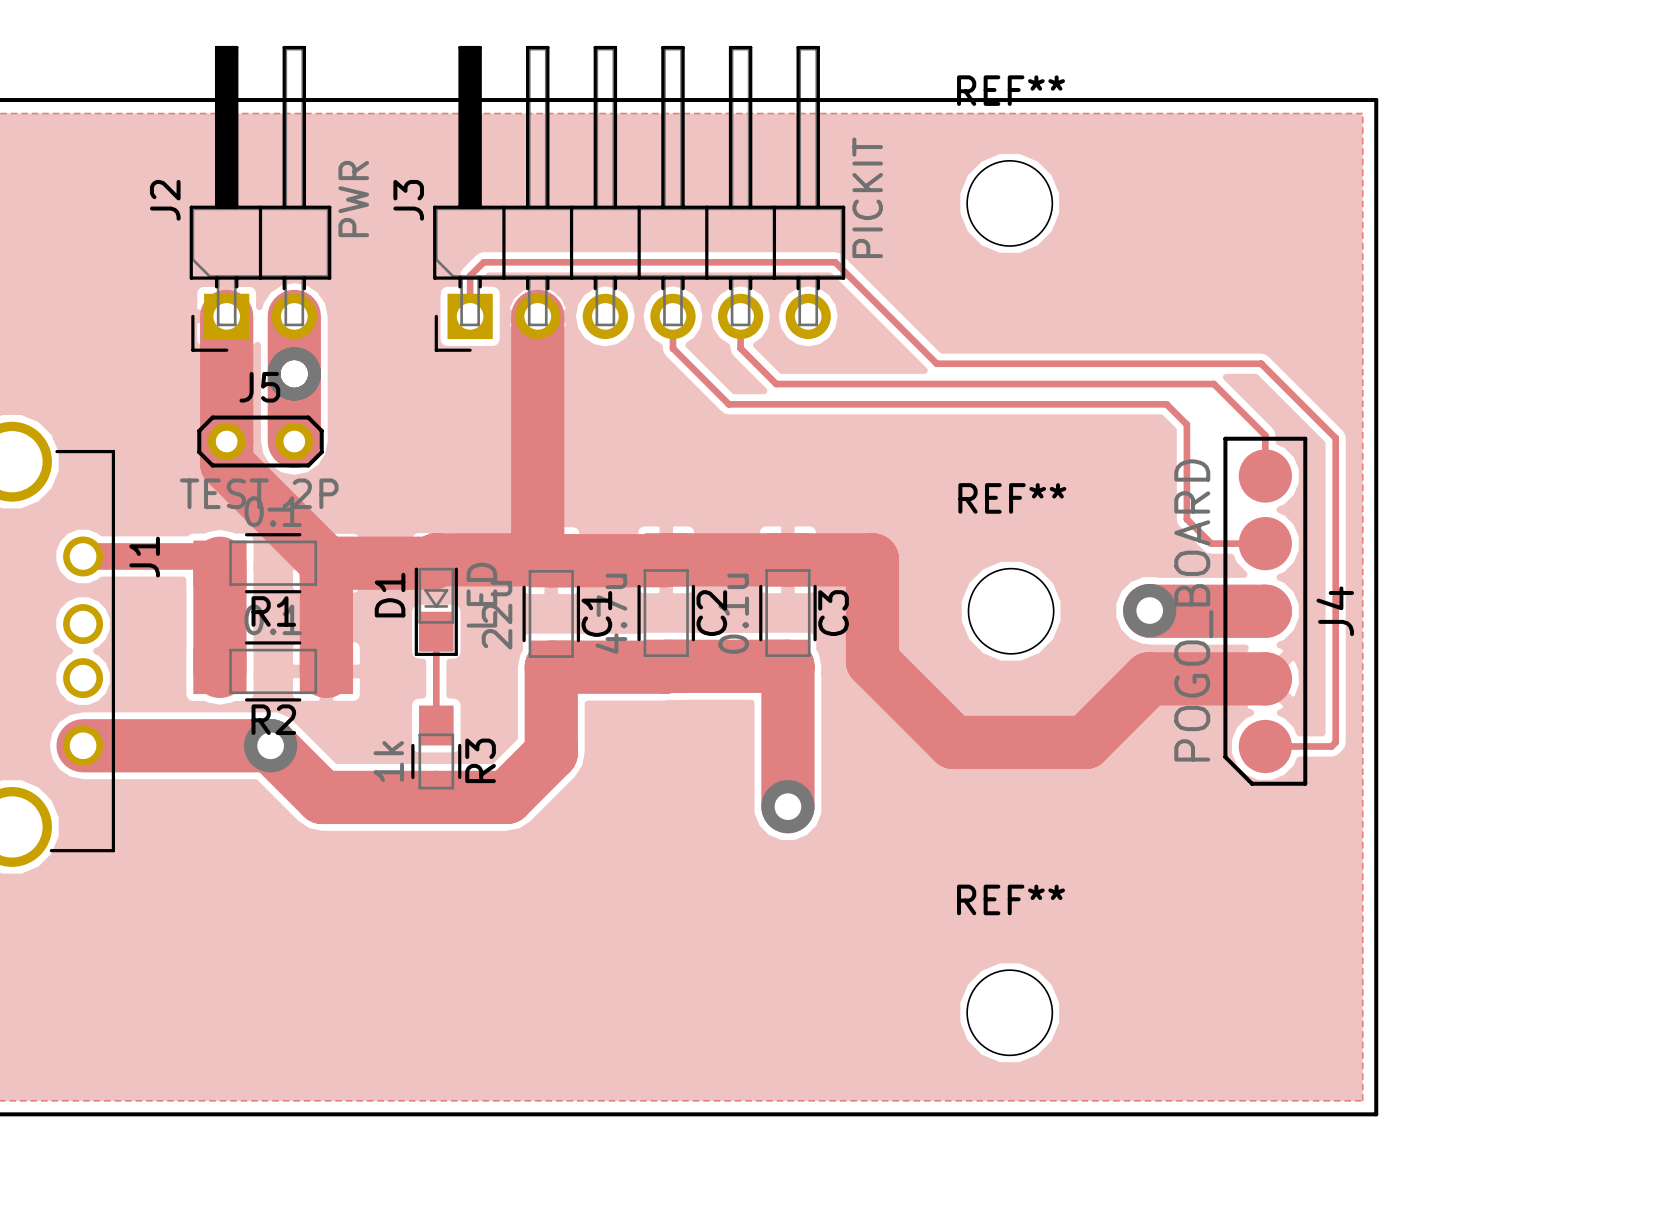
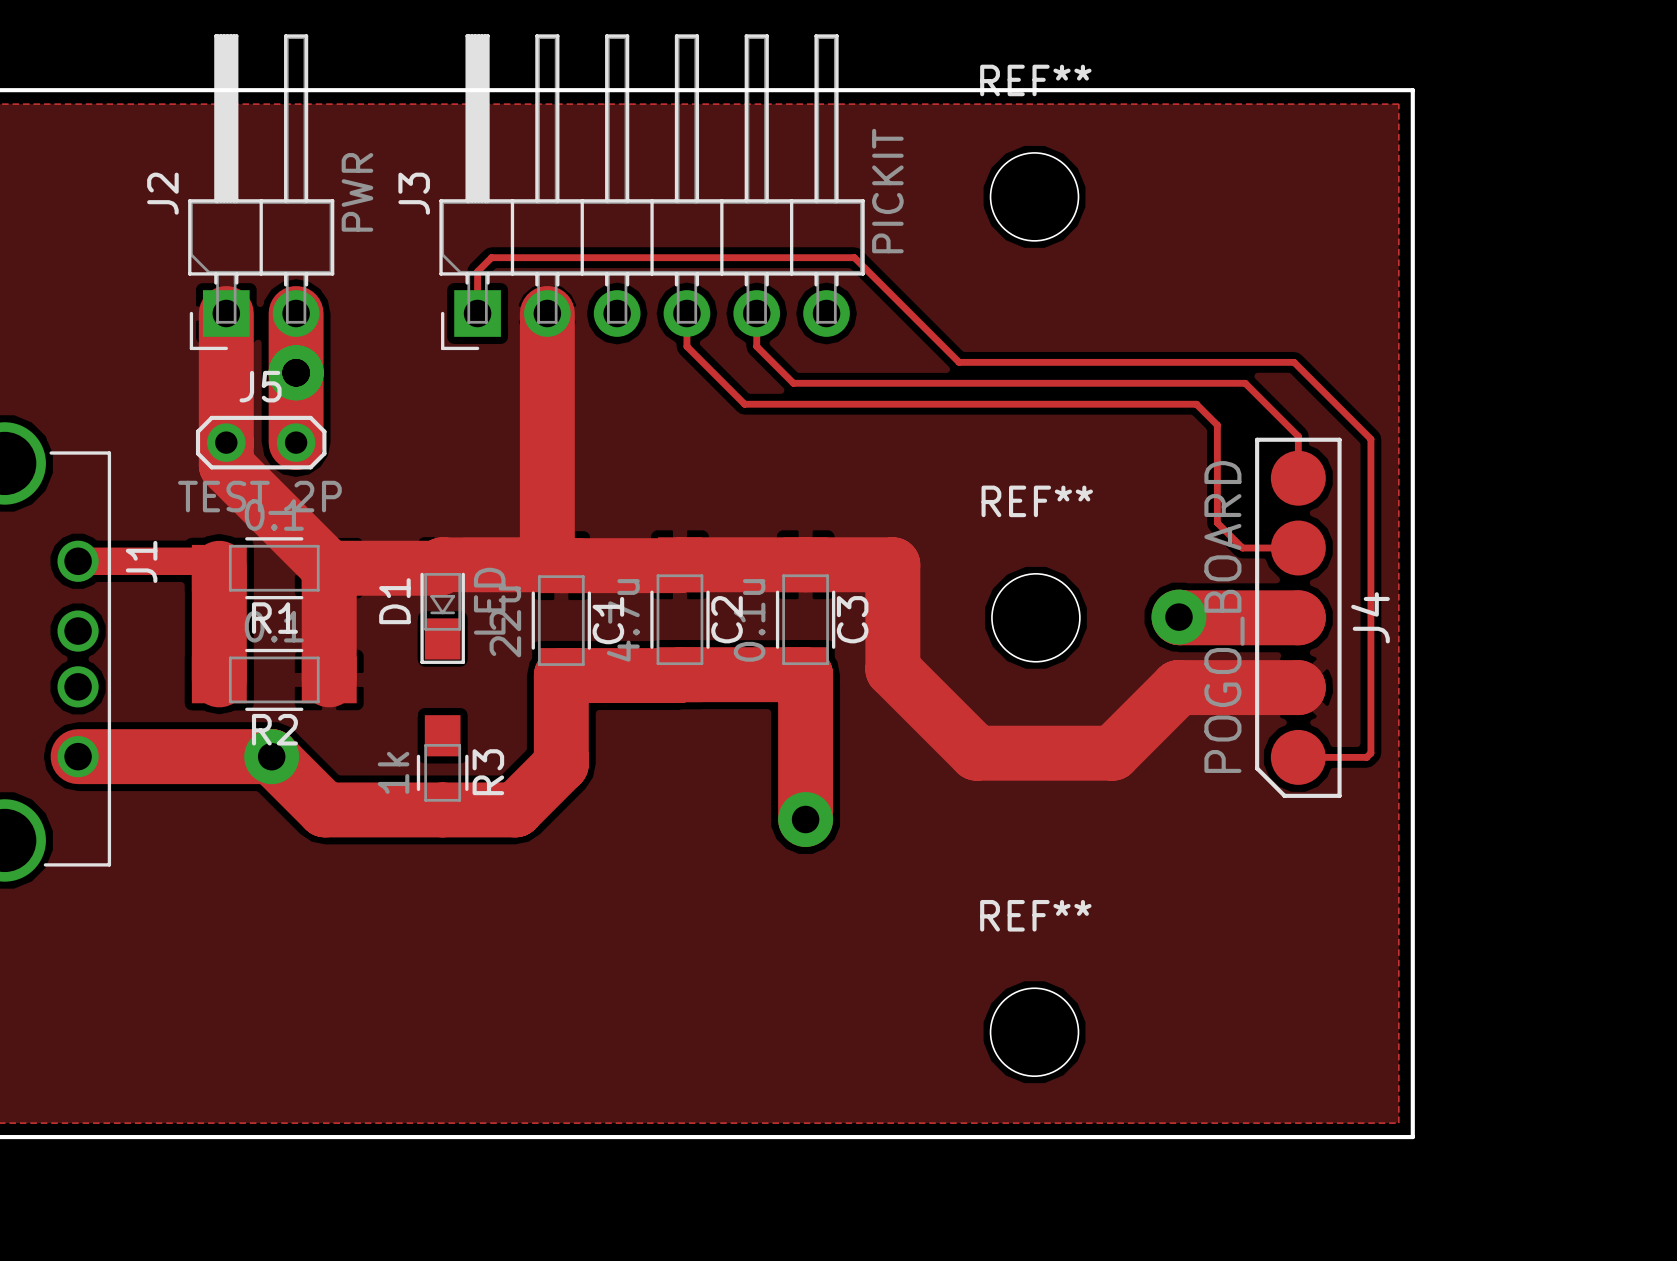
track: (436, 631) (436, 725) -> none

